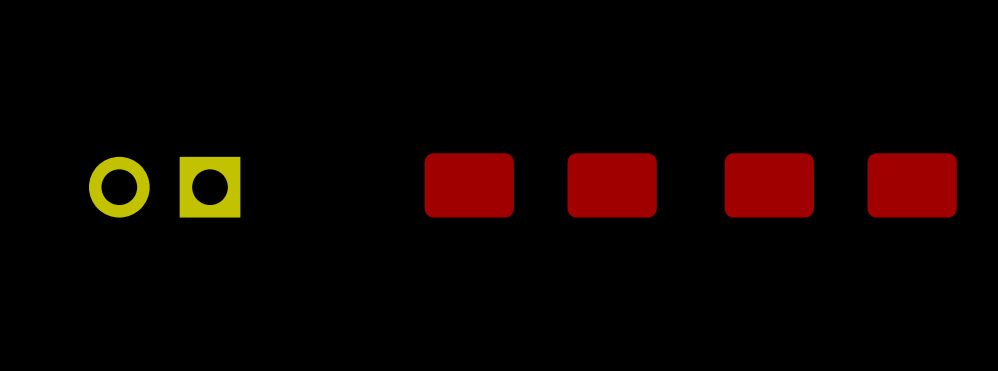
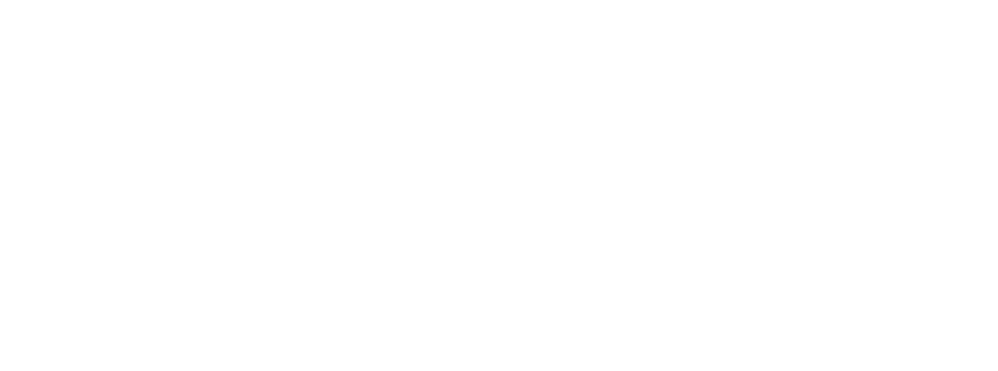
part: (540, 185) -> none
part: (840, 185) -> none
part: (164, 187) -> none

